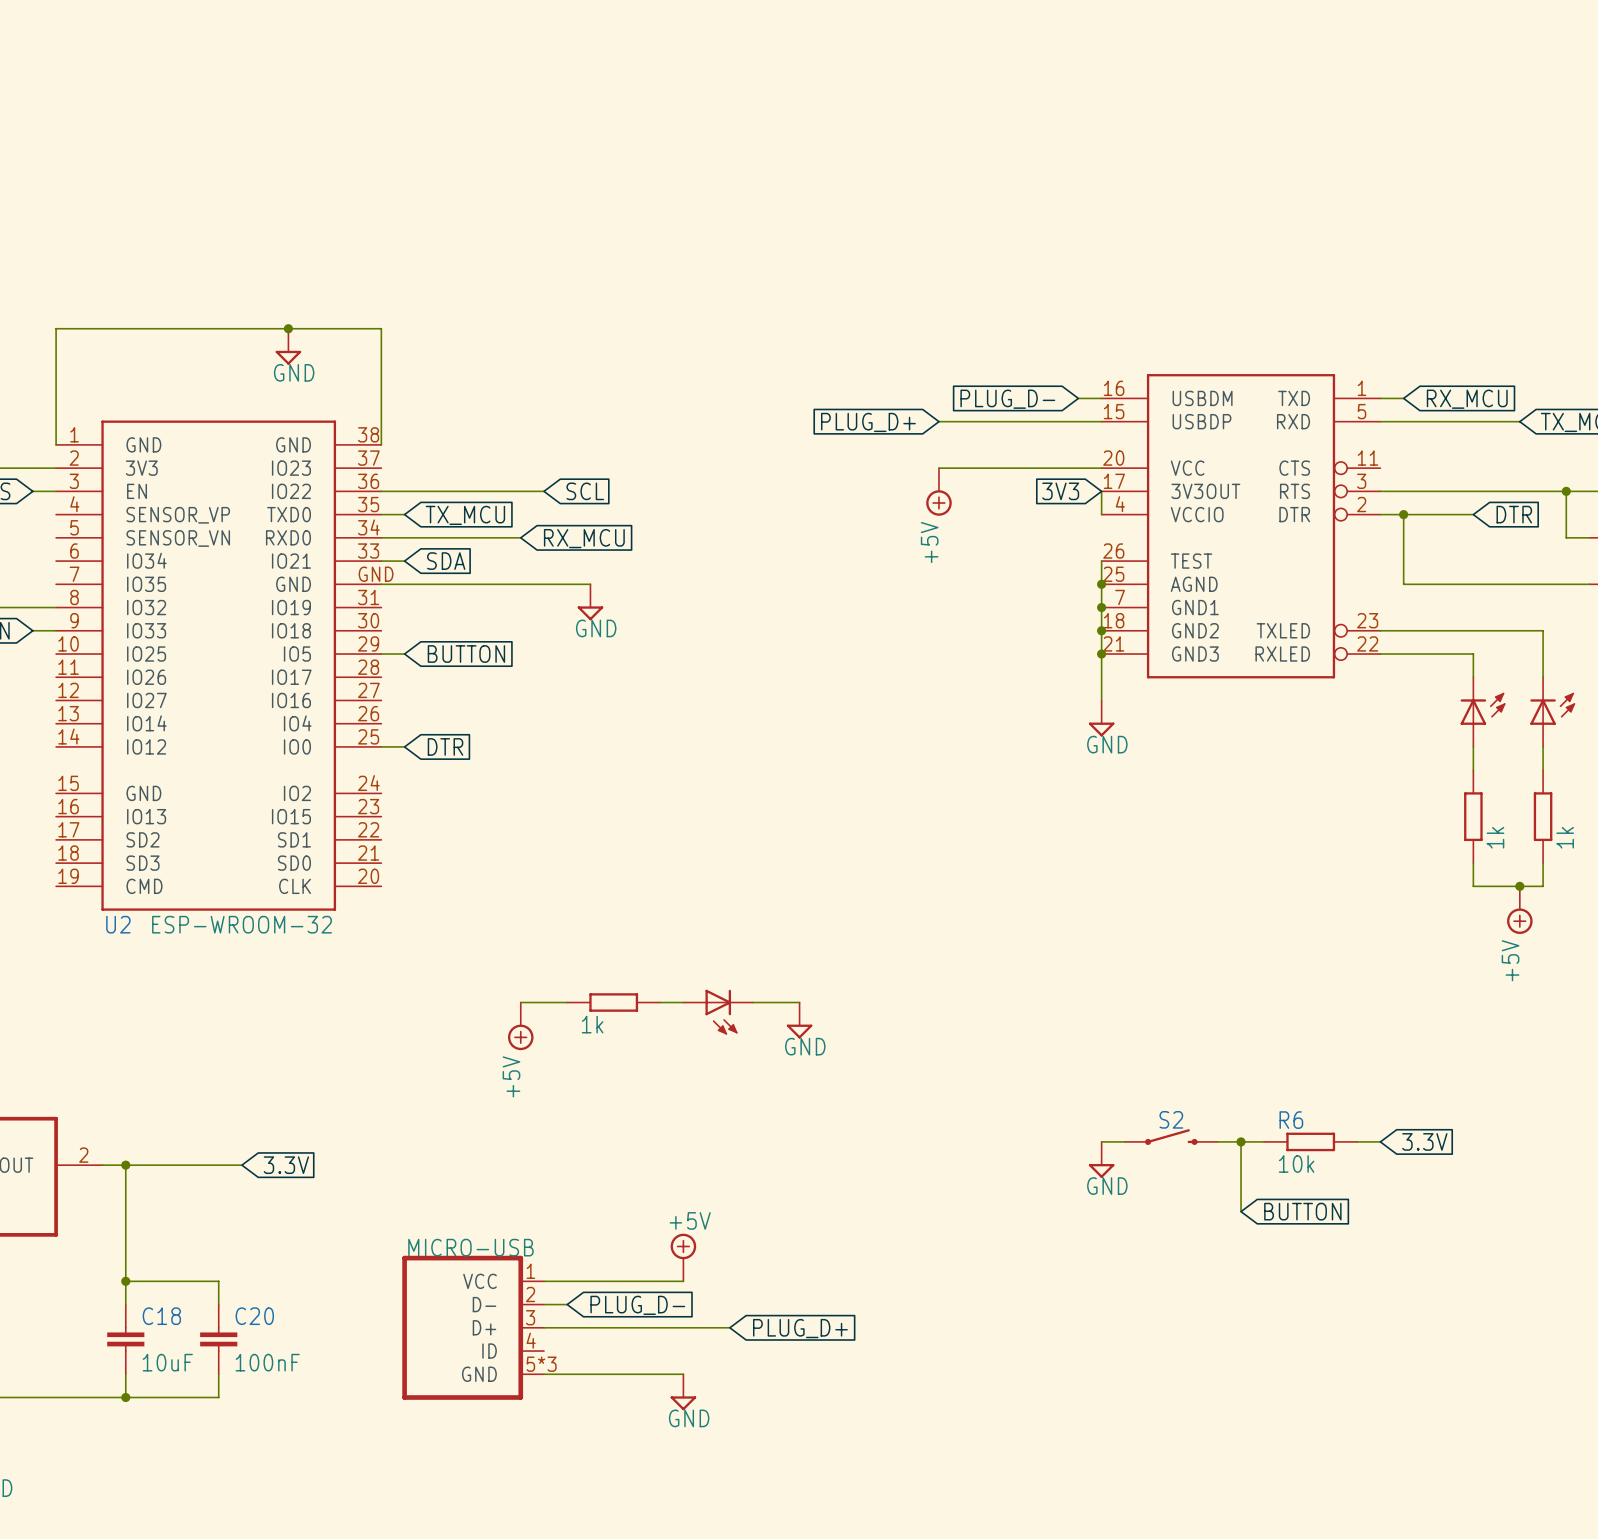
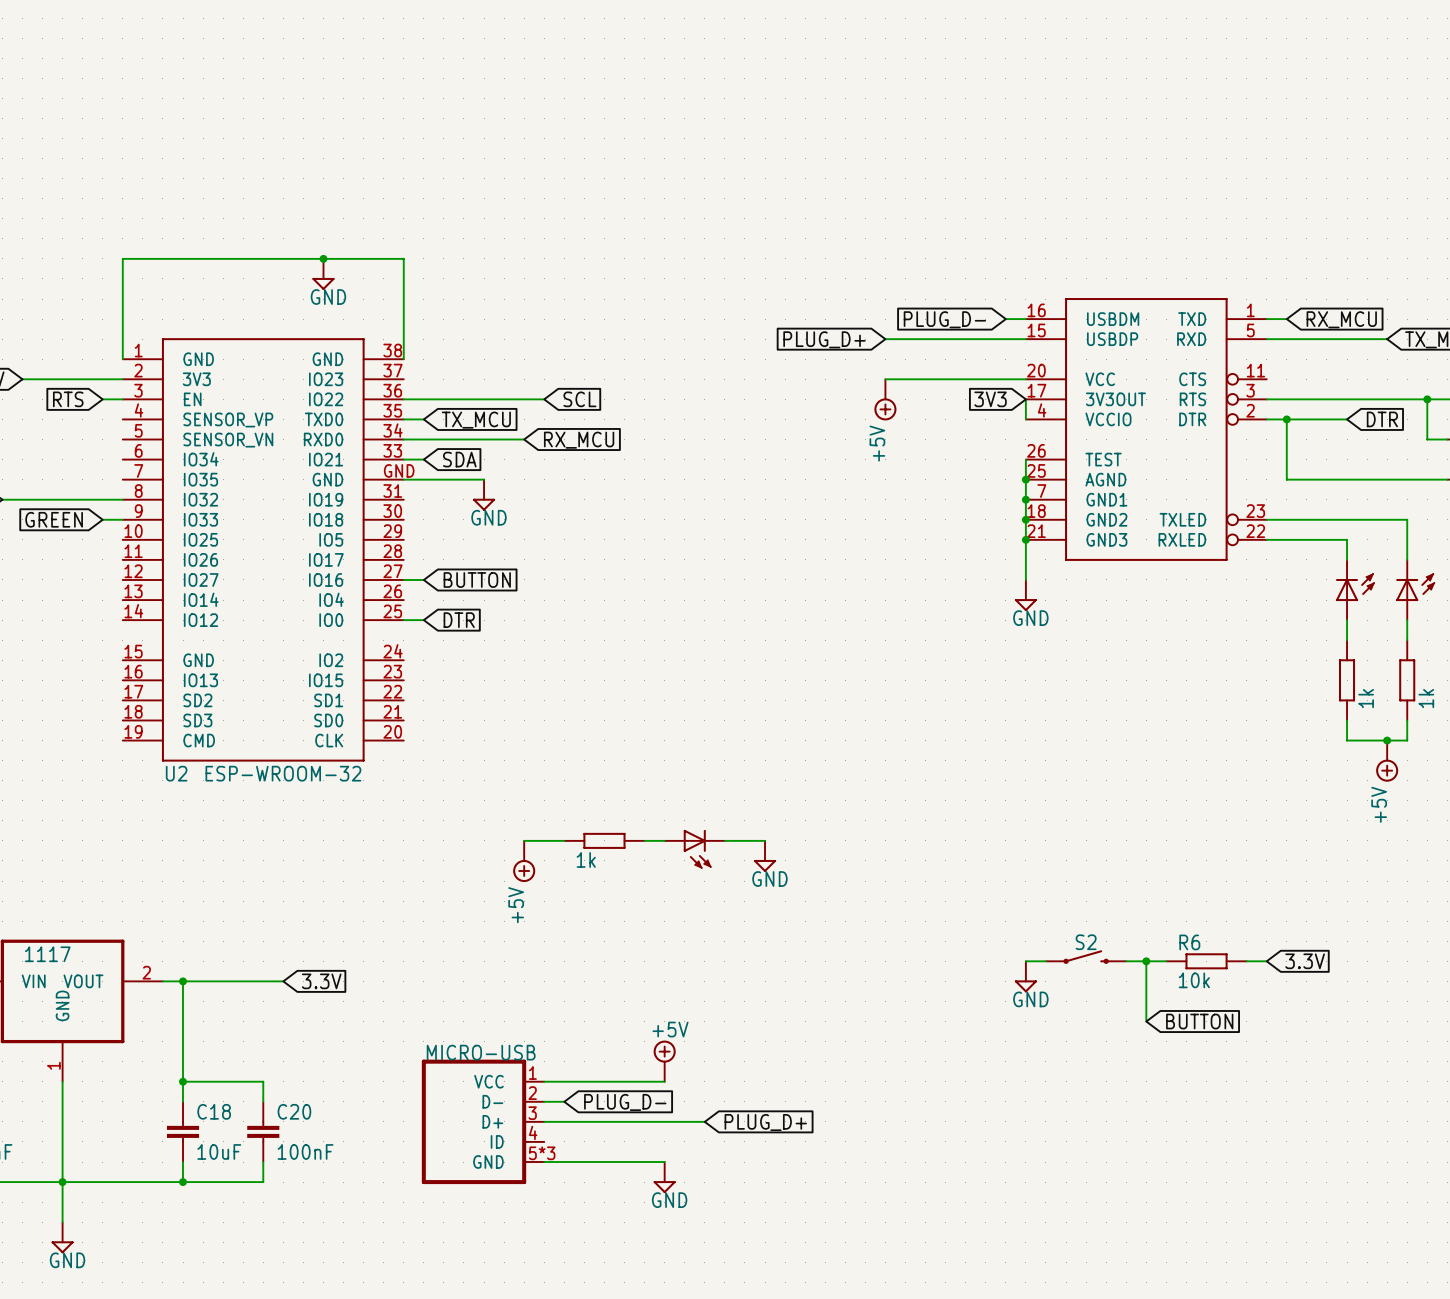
wire: (474, 584) (590, 584) -> none
power symbol position: GND (590, 602) -> GND (484, 495)
wire: (381, 654) (404, 654) -> (403, 579) (423, 579)
global label position: BUTTON (466, 654) -> BUTTON (477, 579)

